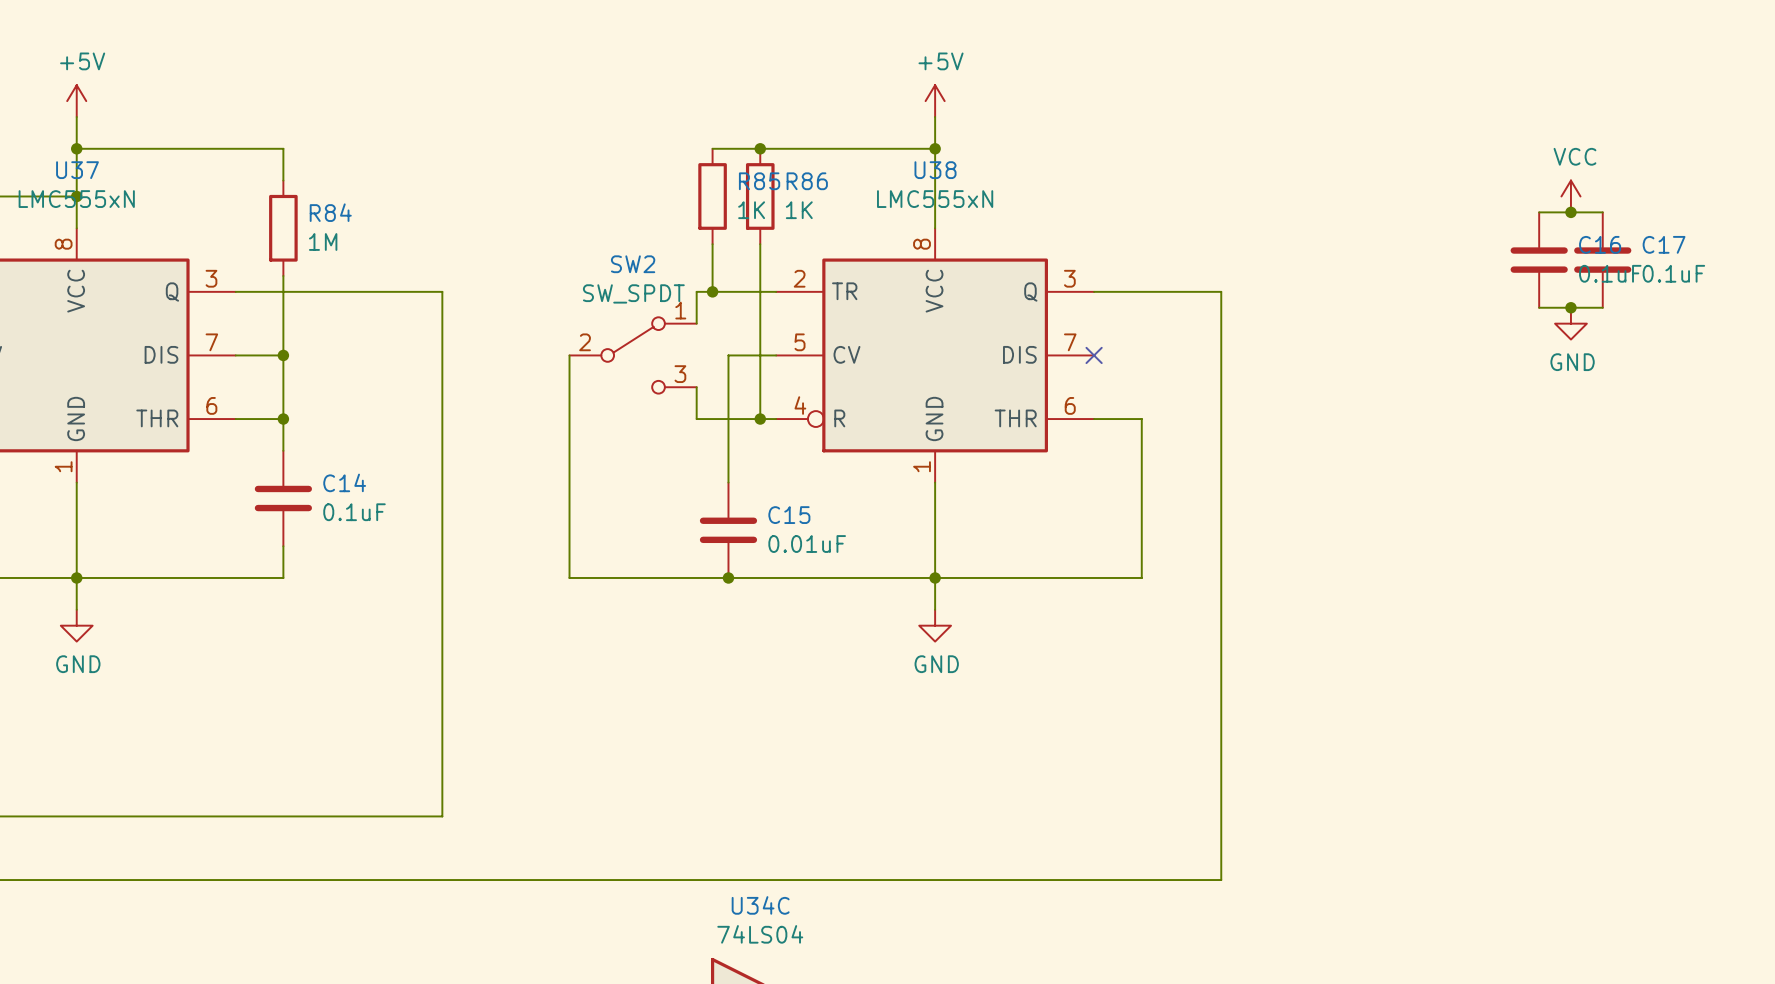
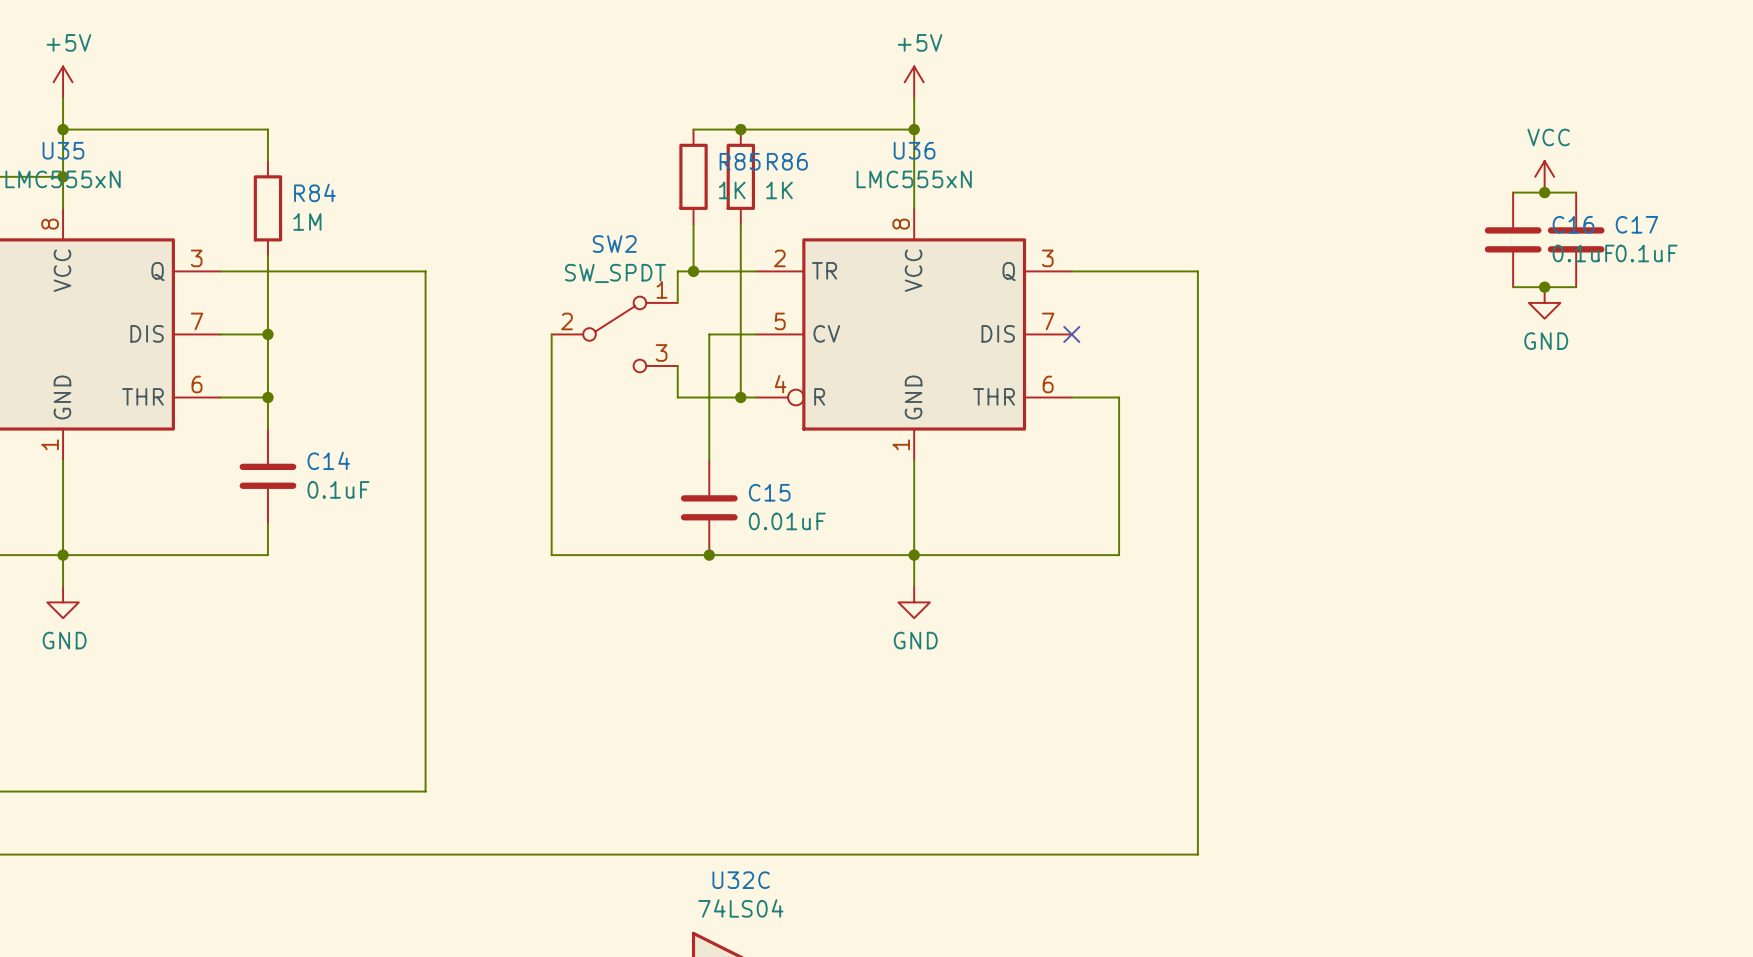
U37 name: U37 (77, 170) -> U35 (63, 150)
U38 name: U38 (935, 170) -> U36 (914, 150)
U34C name: U34C (760, 905) -> U32C (741, 880)

